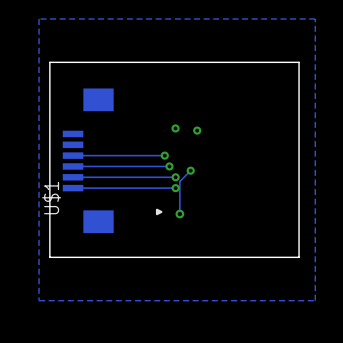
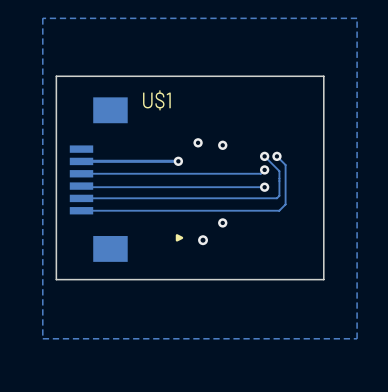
board edge: (299, 62) (49, 62) (49, 257) (299, 257) (299, 62) -> (323, 76) (323, 279) (56, 279) (56, 76) (323, 76)
via: none -> (264, 156)
track: none -> (276, 156) (285, 165) (285, 204) (279, 210) (198, 210)
via: none -> (276, 156)
track: none -> (178, 161) (81, 161)
via: none -> (178, 161)
track: none -> (264, 169) (260, 173) (185, 173)
via: none -> (264, 169)
via: (164, 155) -> none
track: (169, 166) (73, 166) -> (264, 187) (81, 186)
via: (169, 166) -> none
via: none -> (264, 187)
track: (190, 170) (179, 181) (179, 214) -> none
via: (190, 170) -> none
track: (175, 177) (73, 177) -> (264, 156) (279, 171) (279, 195) (276, 198) (81, 198)
via: (175, 177) -> none
via: (175, 188) -> none
U$1 name rotation: 0° (51, 198) -> 90° clockwise (156, 100)
U$1 name position: U$1 (51, 198) -> U$1 (156, 100)
via: none -> (222, 222)

